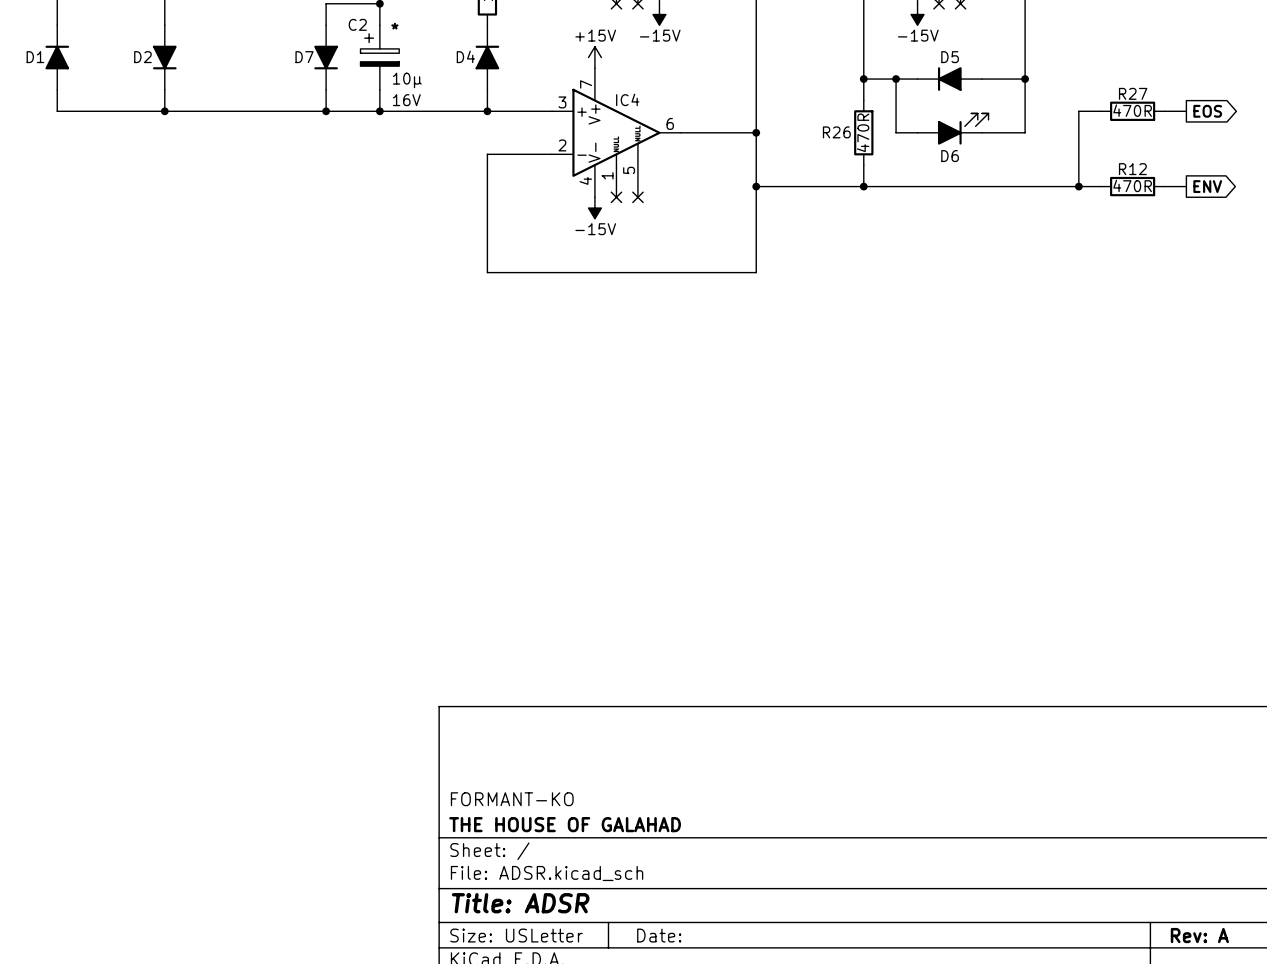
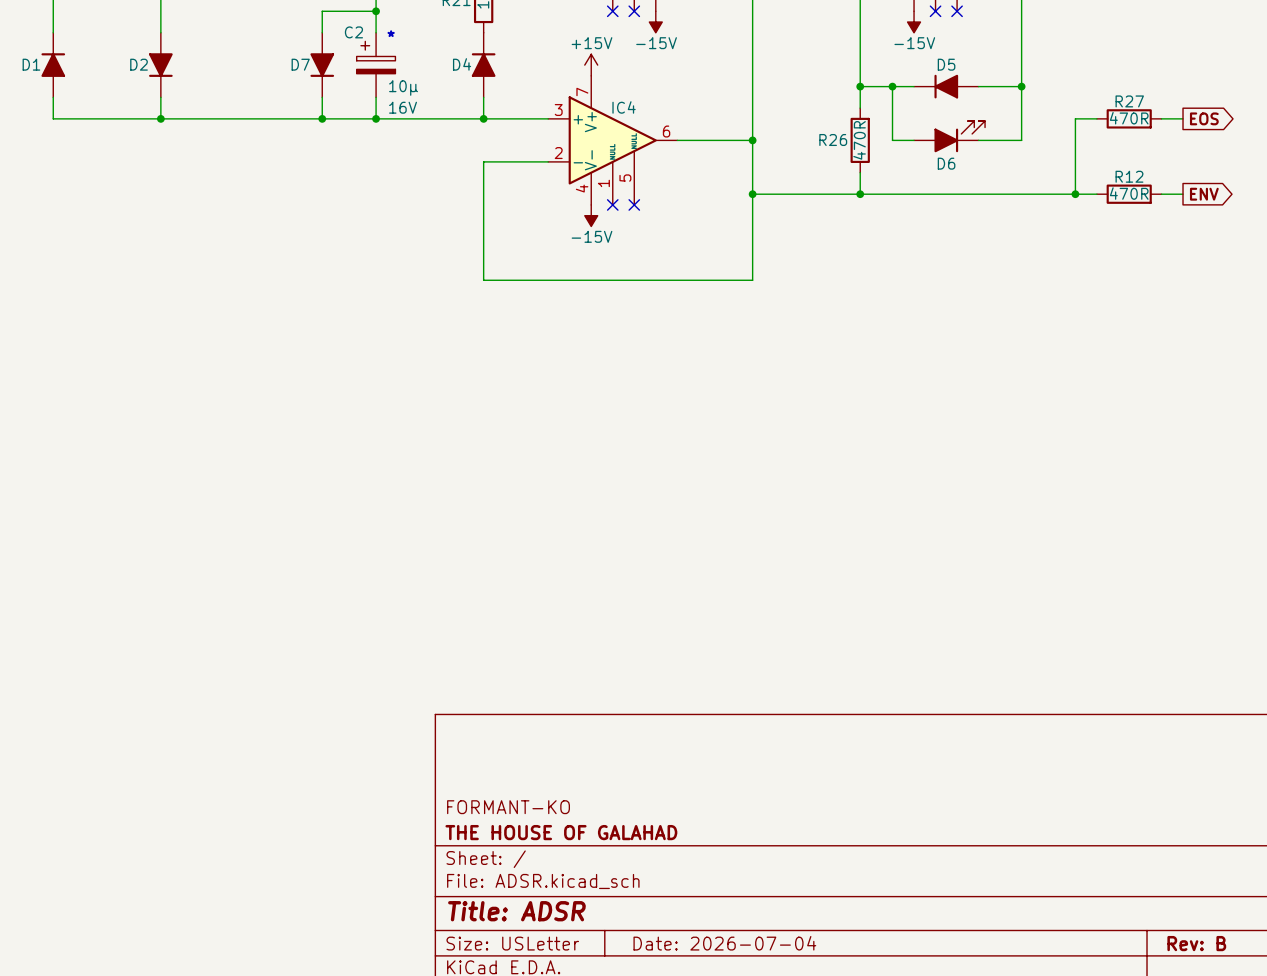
title block: Date: (659, 935) -> Date: 2026-07-04 (724, 943)
title block: Rev: A (1199, 935) -> Rev: B (1196, 943)

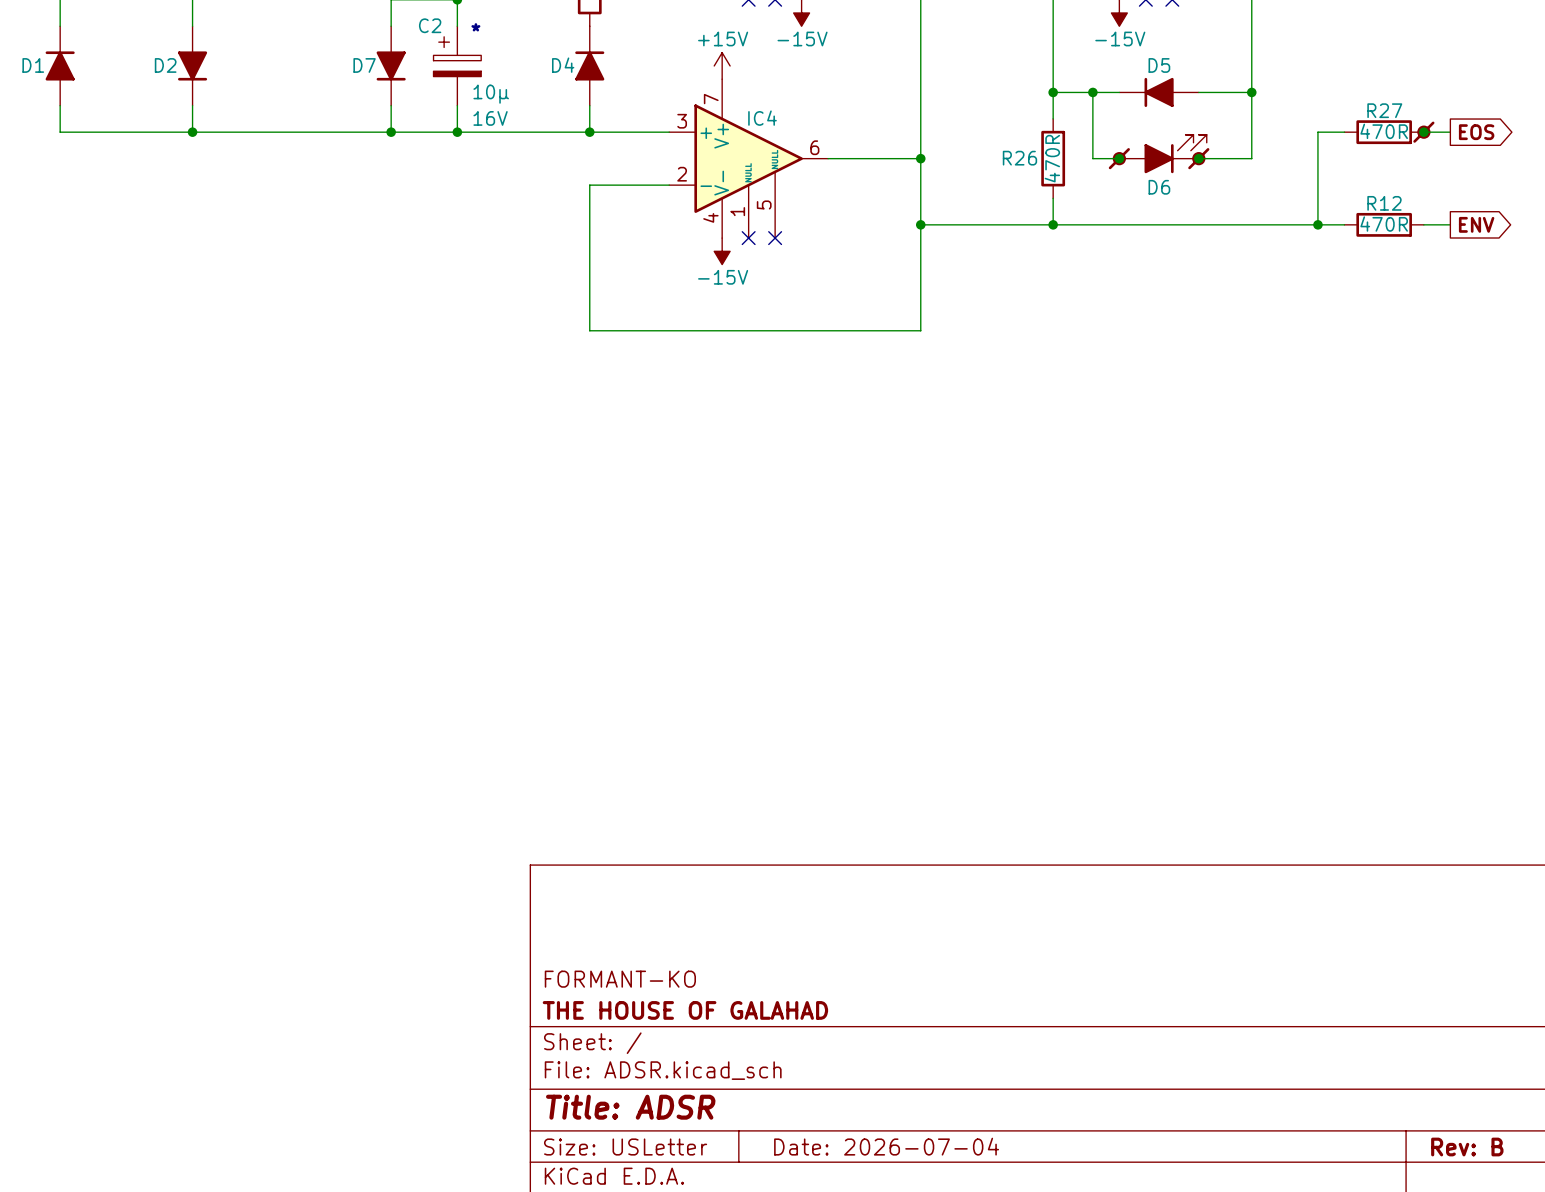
junction: none -> (1423, 132)
part: none -> (1423, 132)
junction: none -> (1119, 158)
part: none -> (1119, 158)
junction: none -> (1198, 158)
part: none -> (1198, 158)

